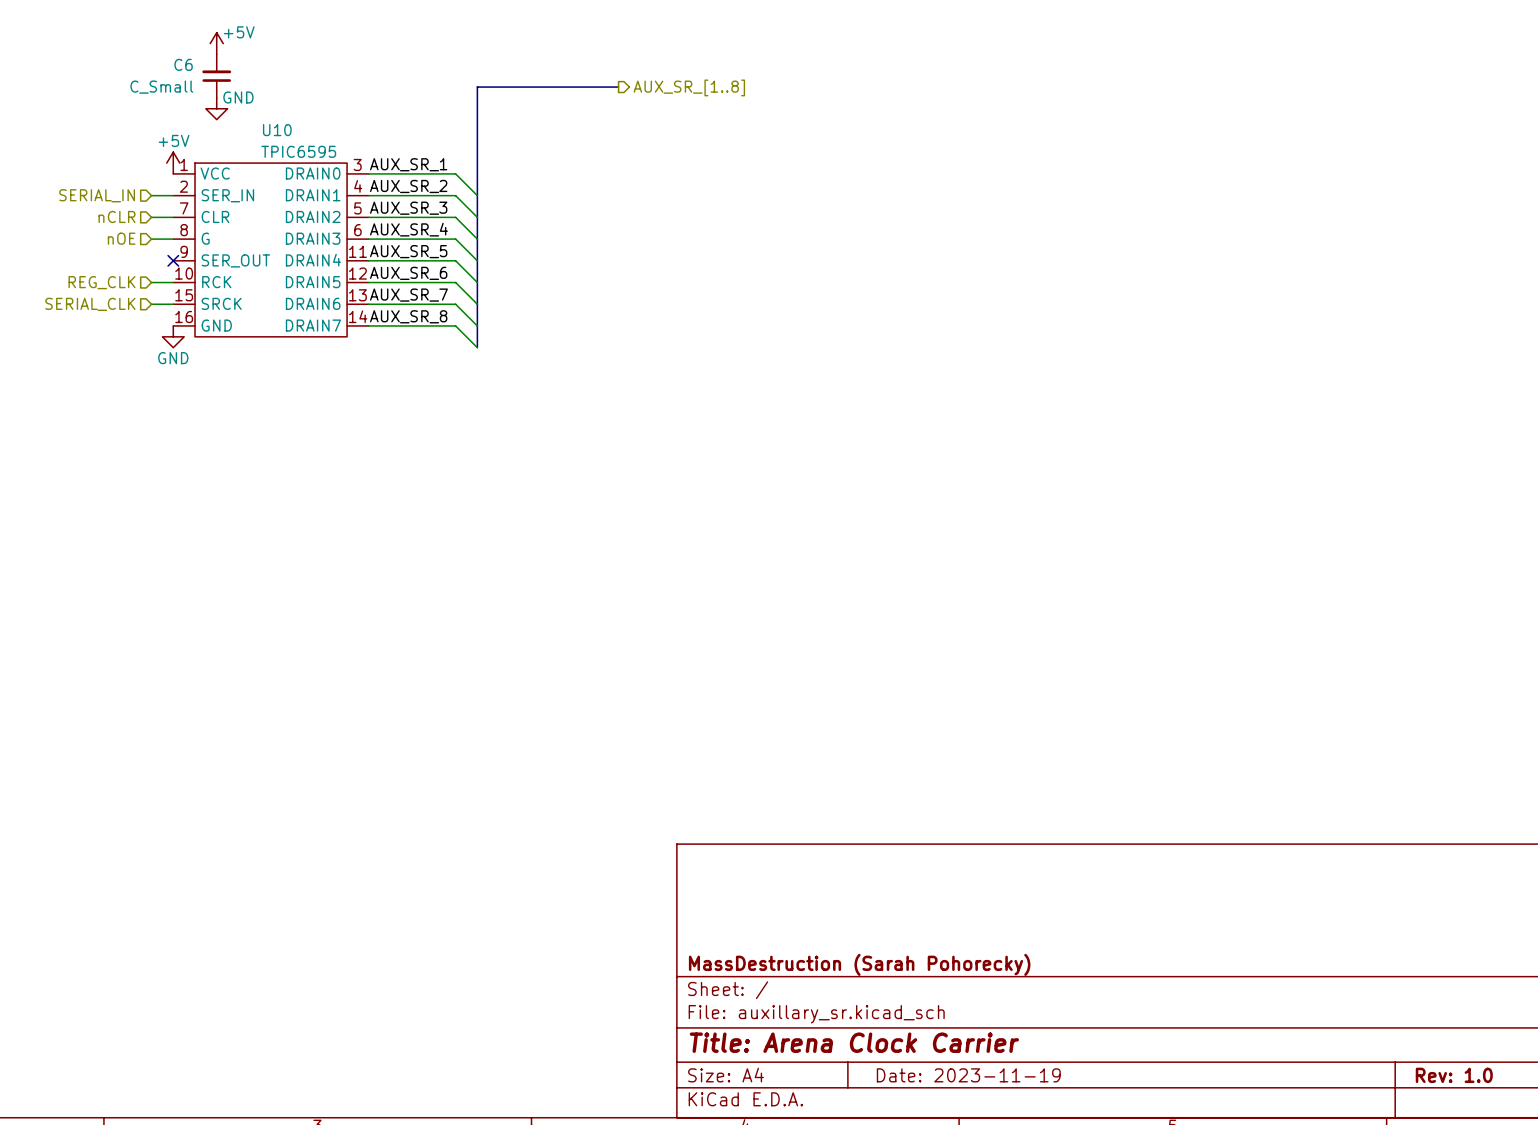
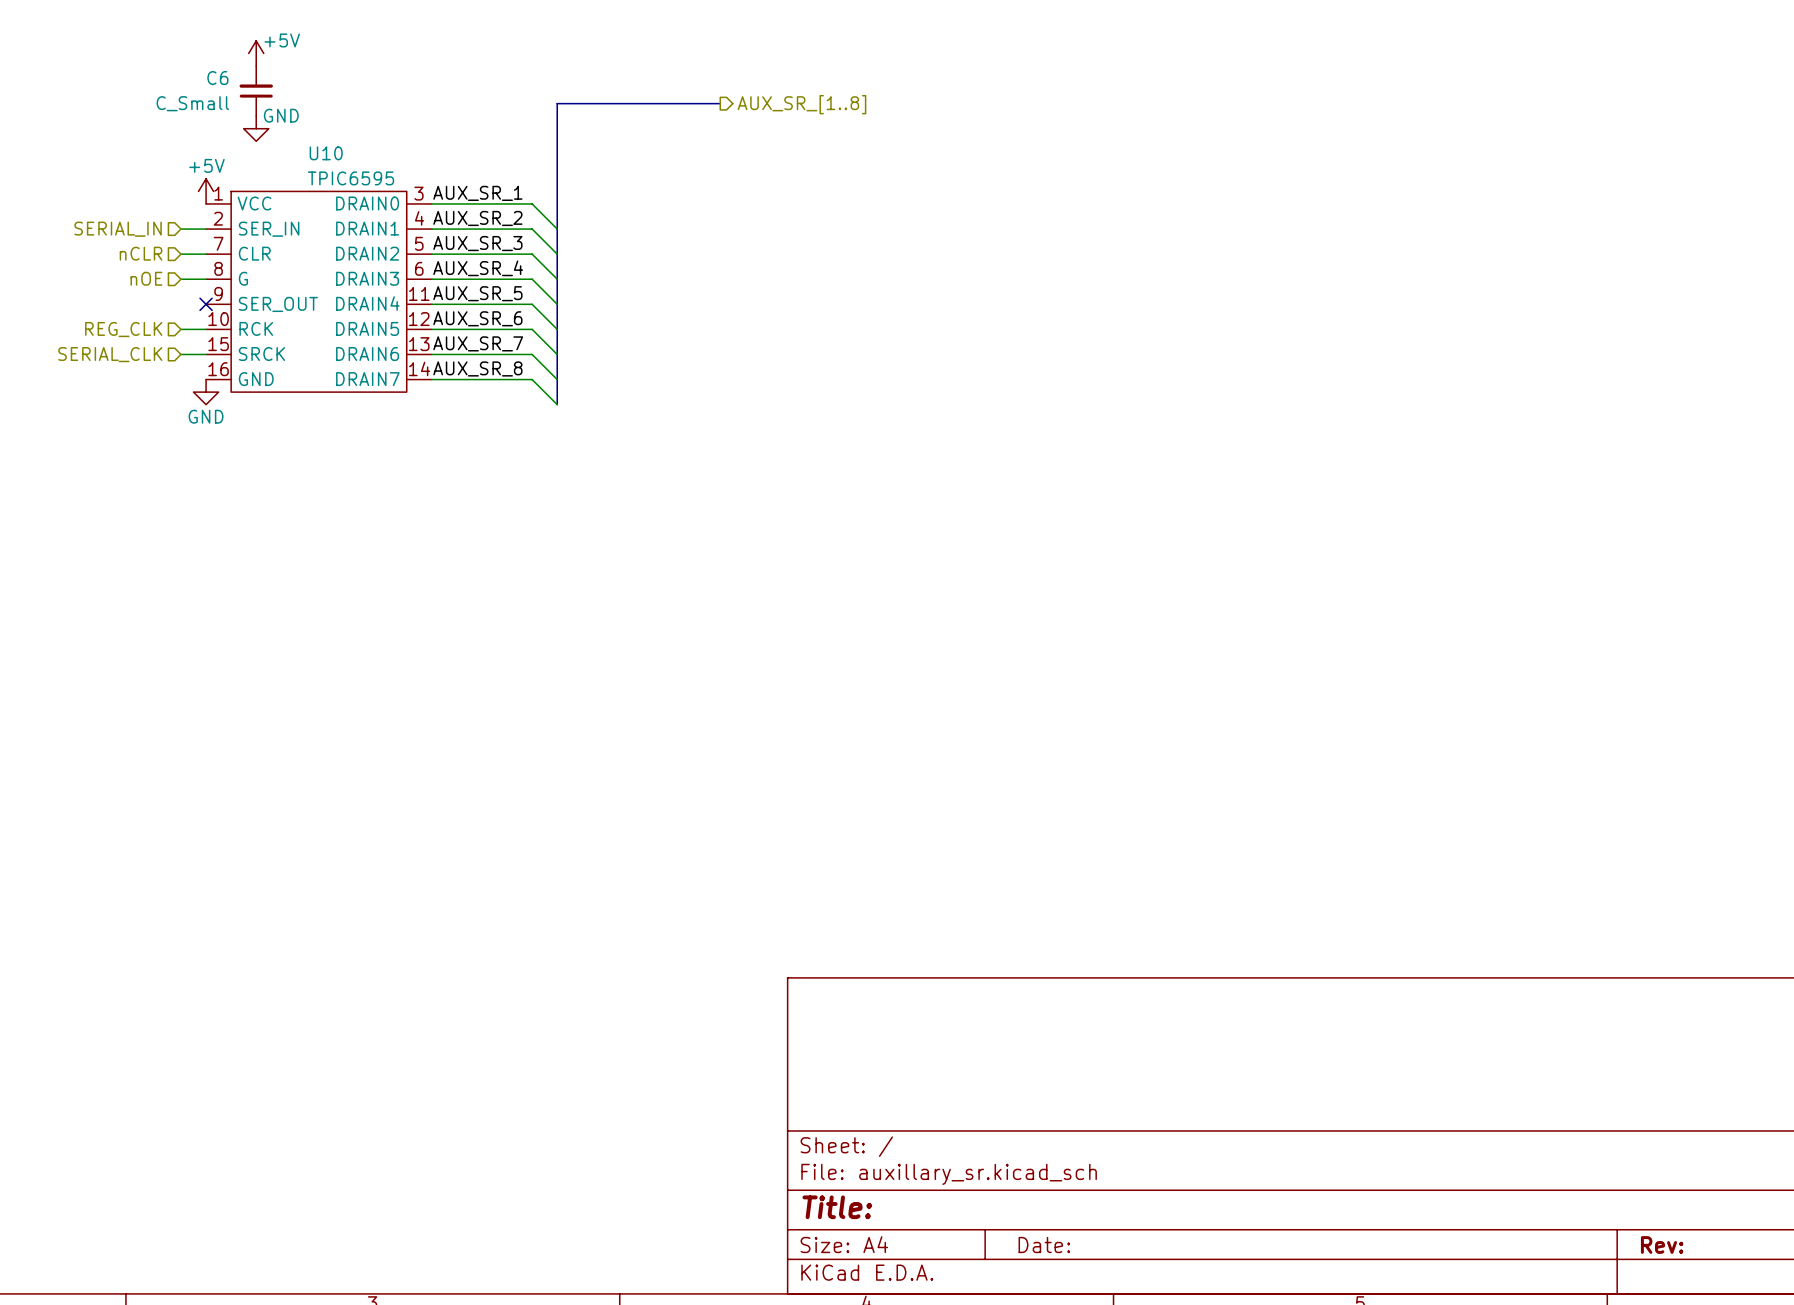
title block: MassDestruction (Sarah Pohorecky) (859, 964) -> none
title block: Title: Arena Clock Carrier (854, 1042) -> Title: (837, 1207)
title block: Date: 2023-11-19 (968, 1075) -> Date: (1044, 1244)
title block: Rev: 1.0 (1454, 1075) -> Rev: (1662, 1244)

